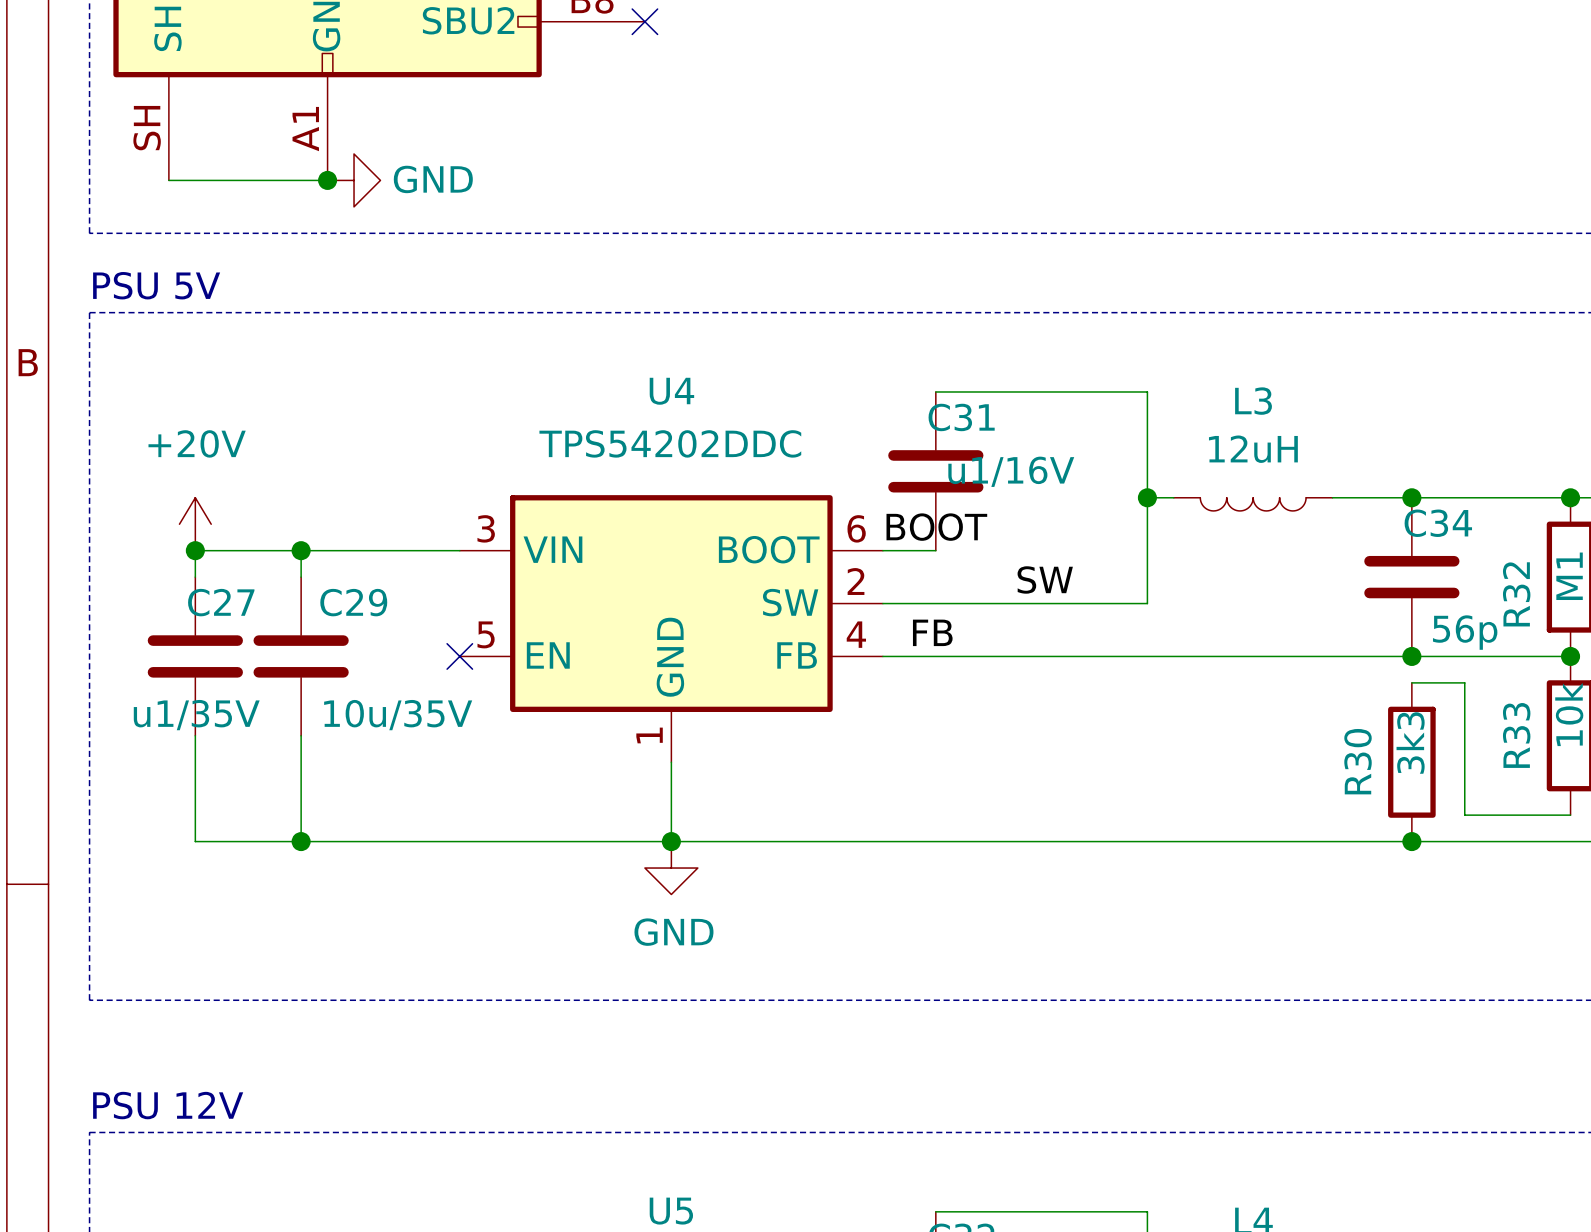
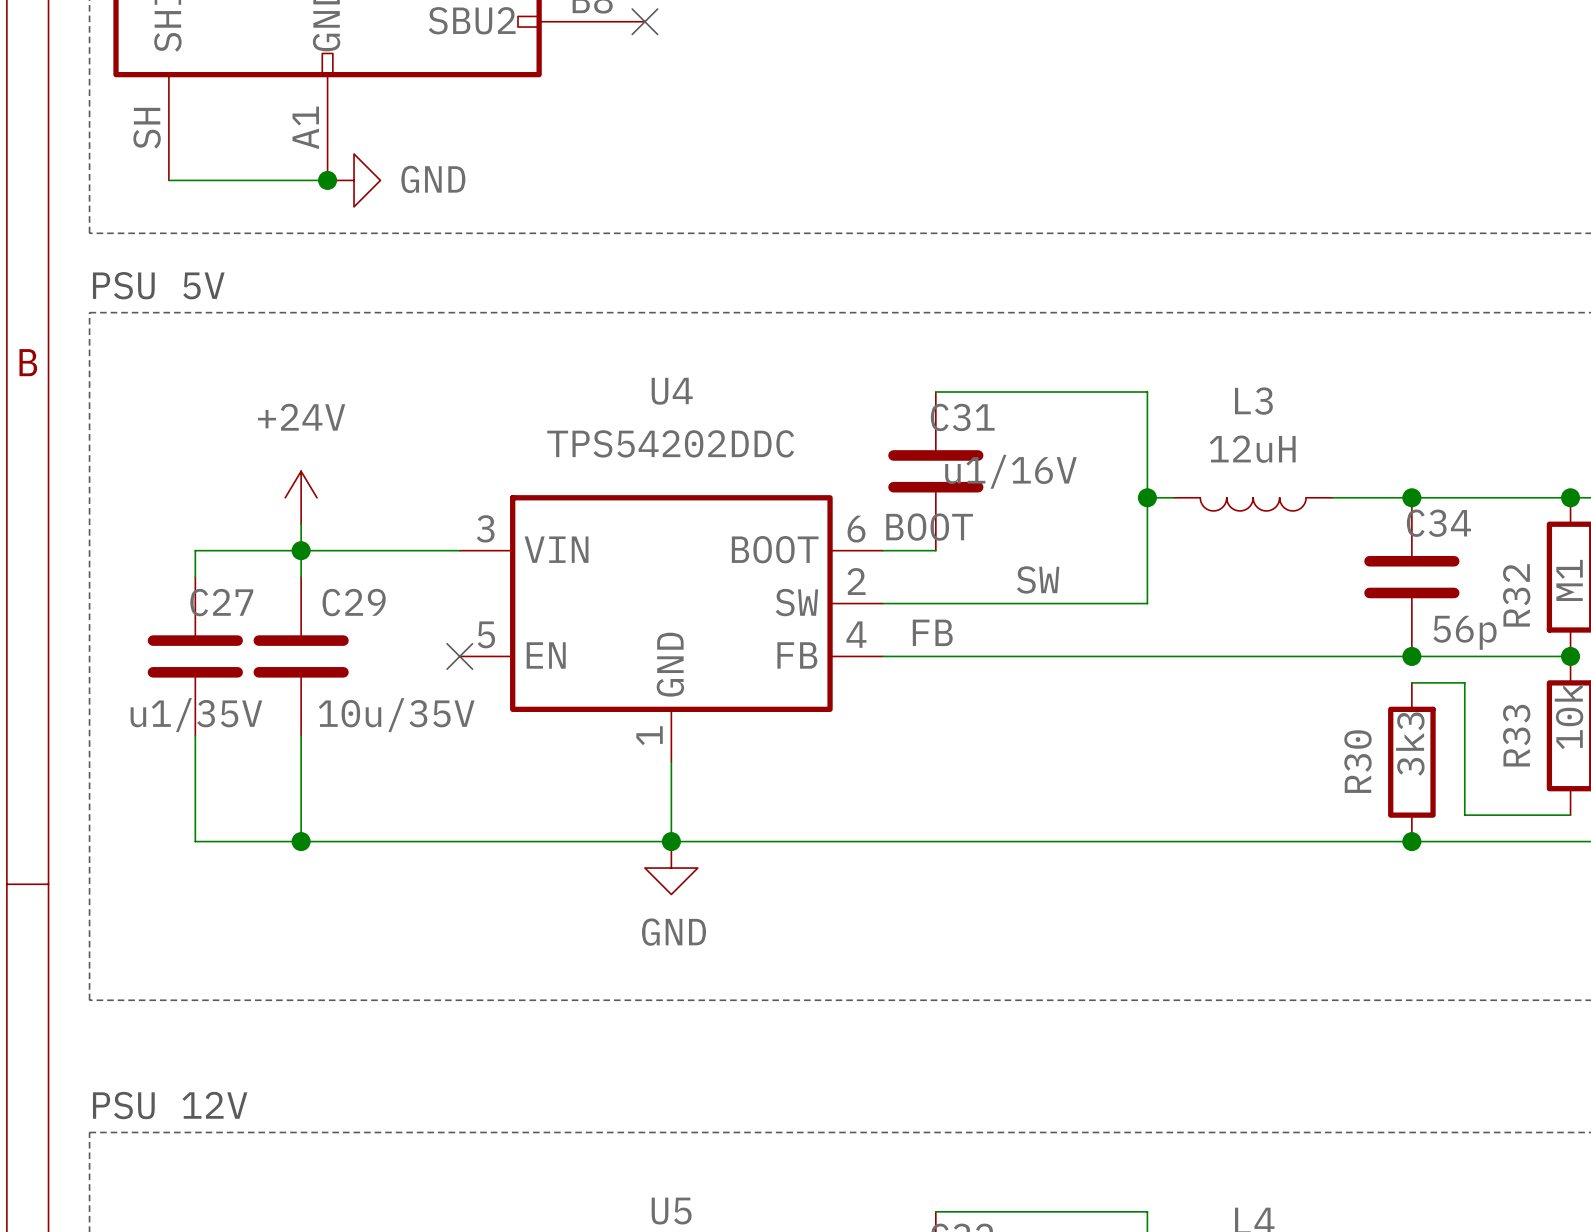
power symbol: none -> +24V (301, 497)
power symbol: +20V (195, 524) -> none
wire: none -> (301, 524) (301, 550)
junction: (195, 550) -> none

